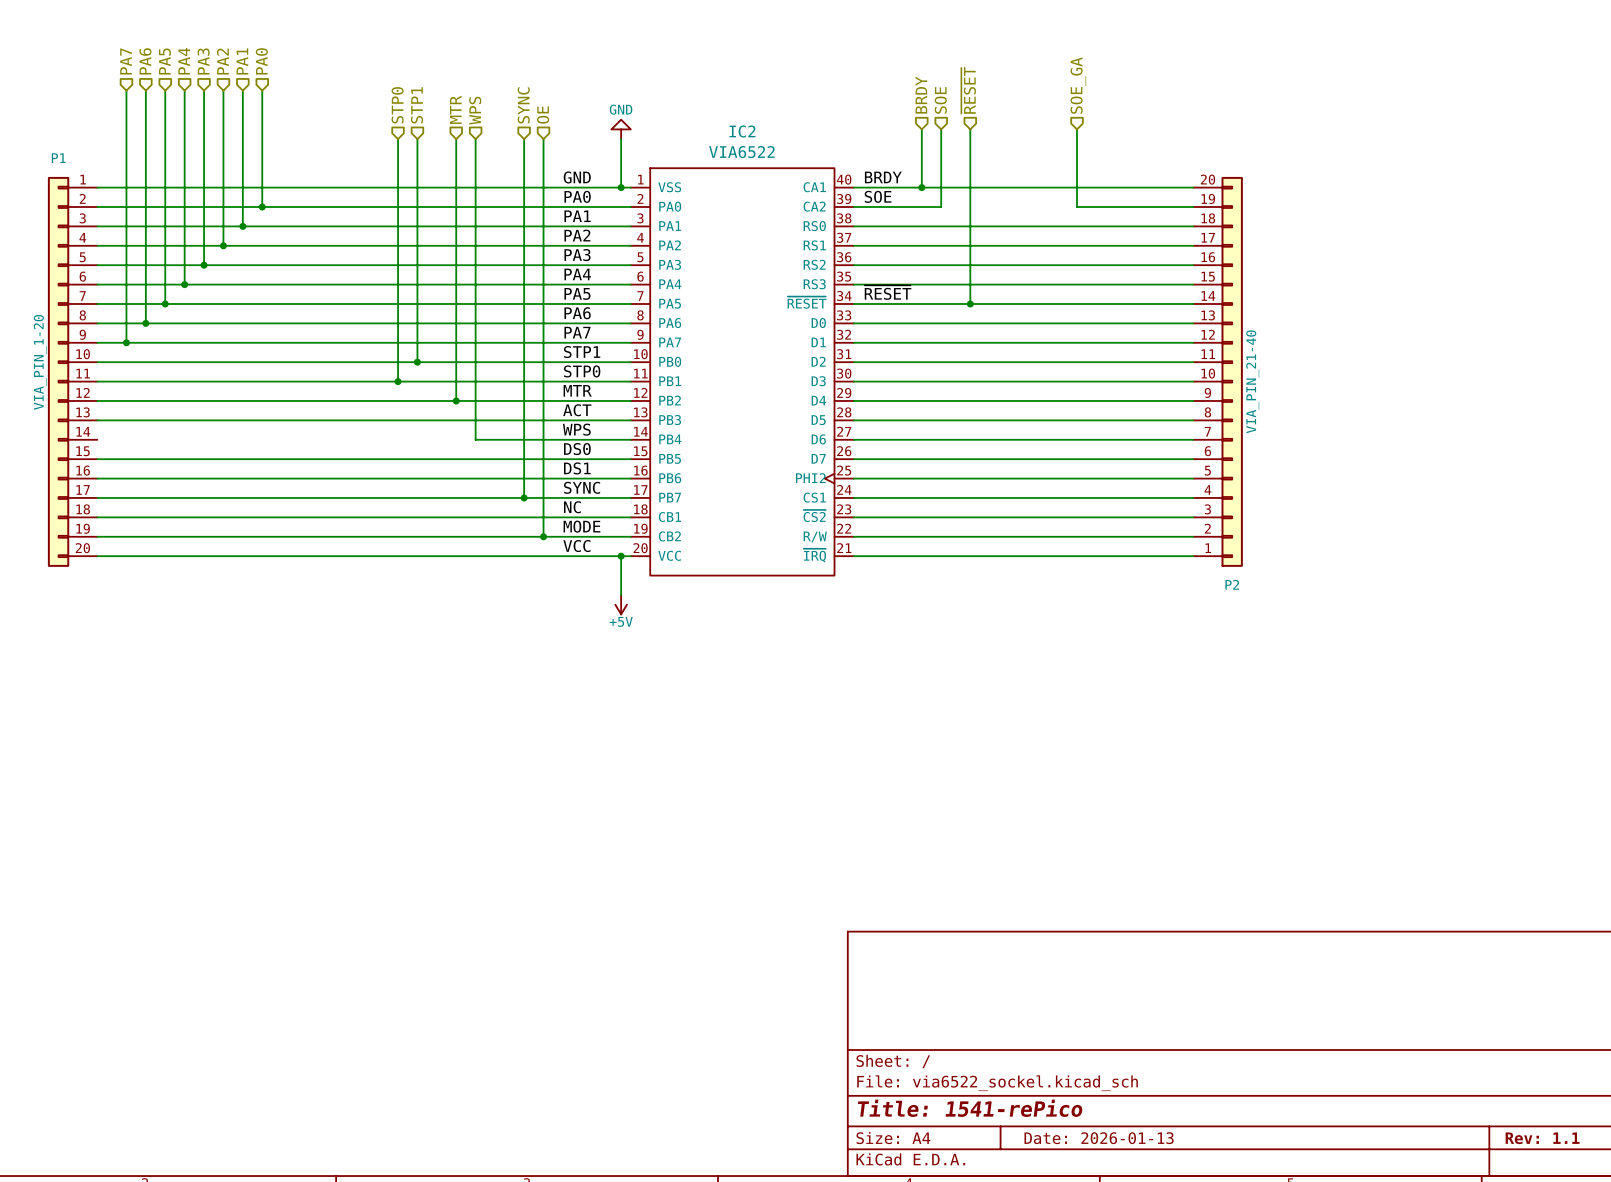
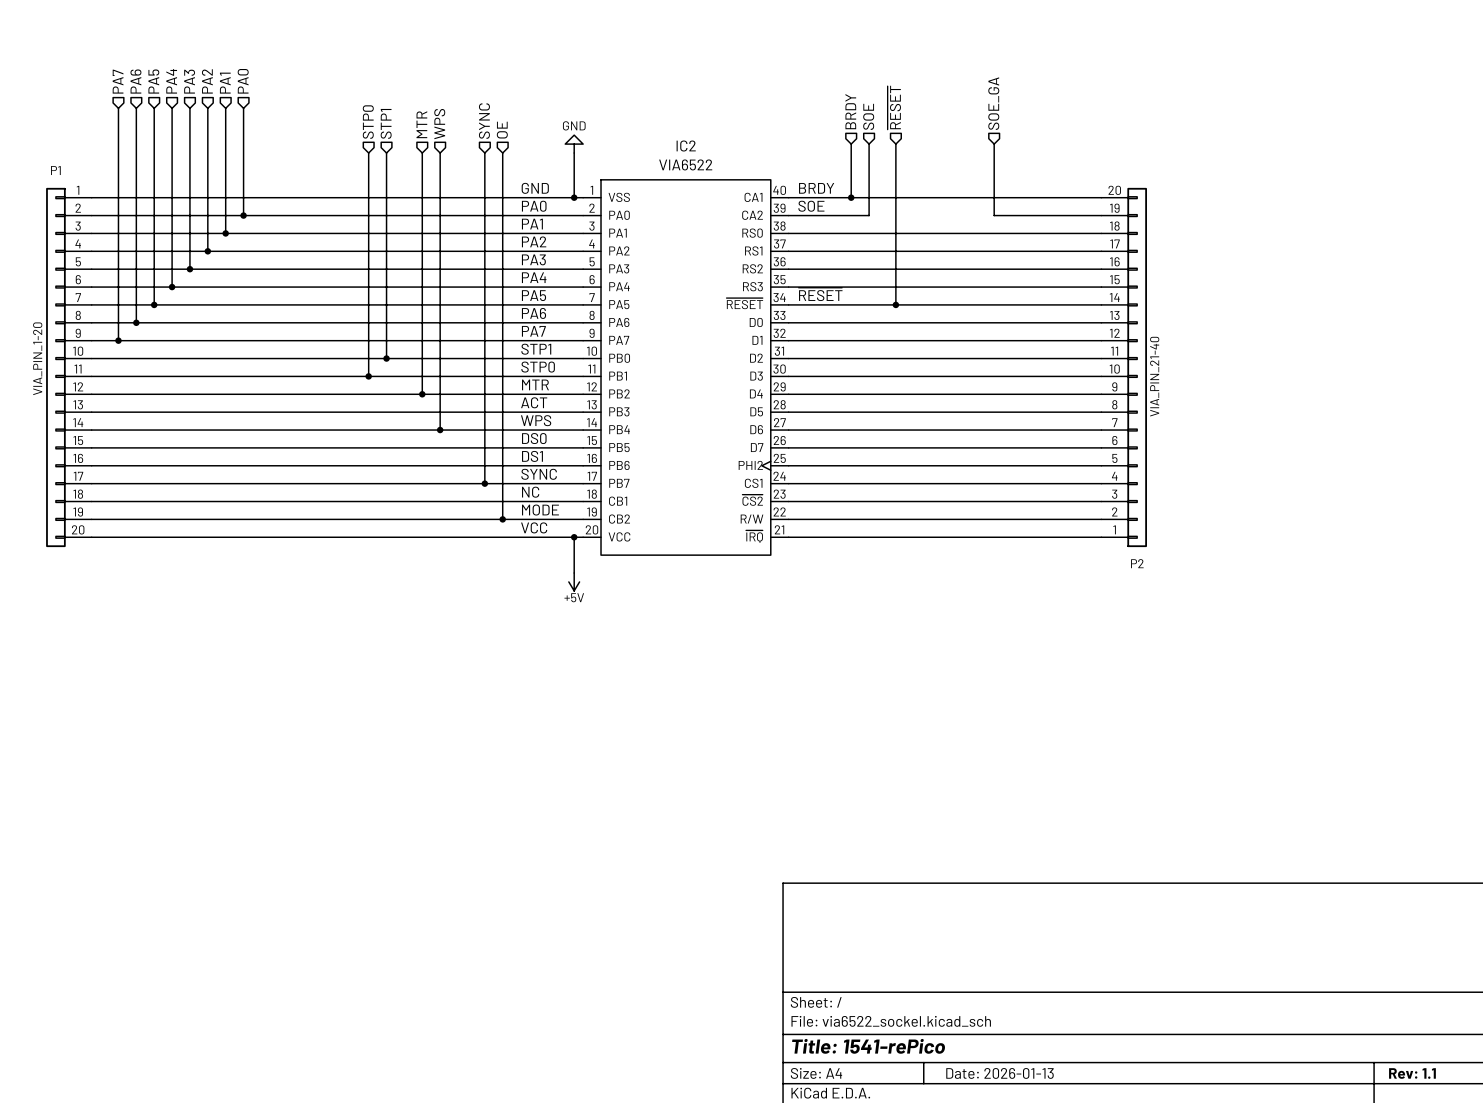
wire: none -> (91, 430) (440, 430)
junction: none -> (440, 430)

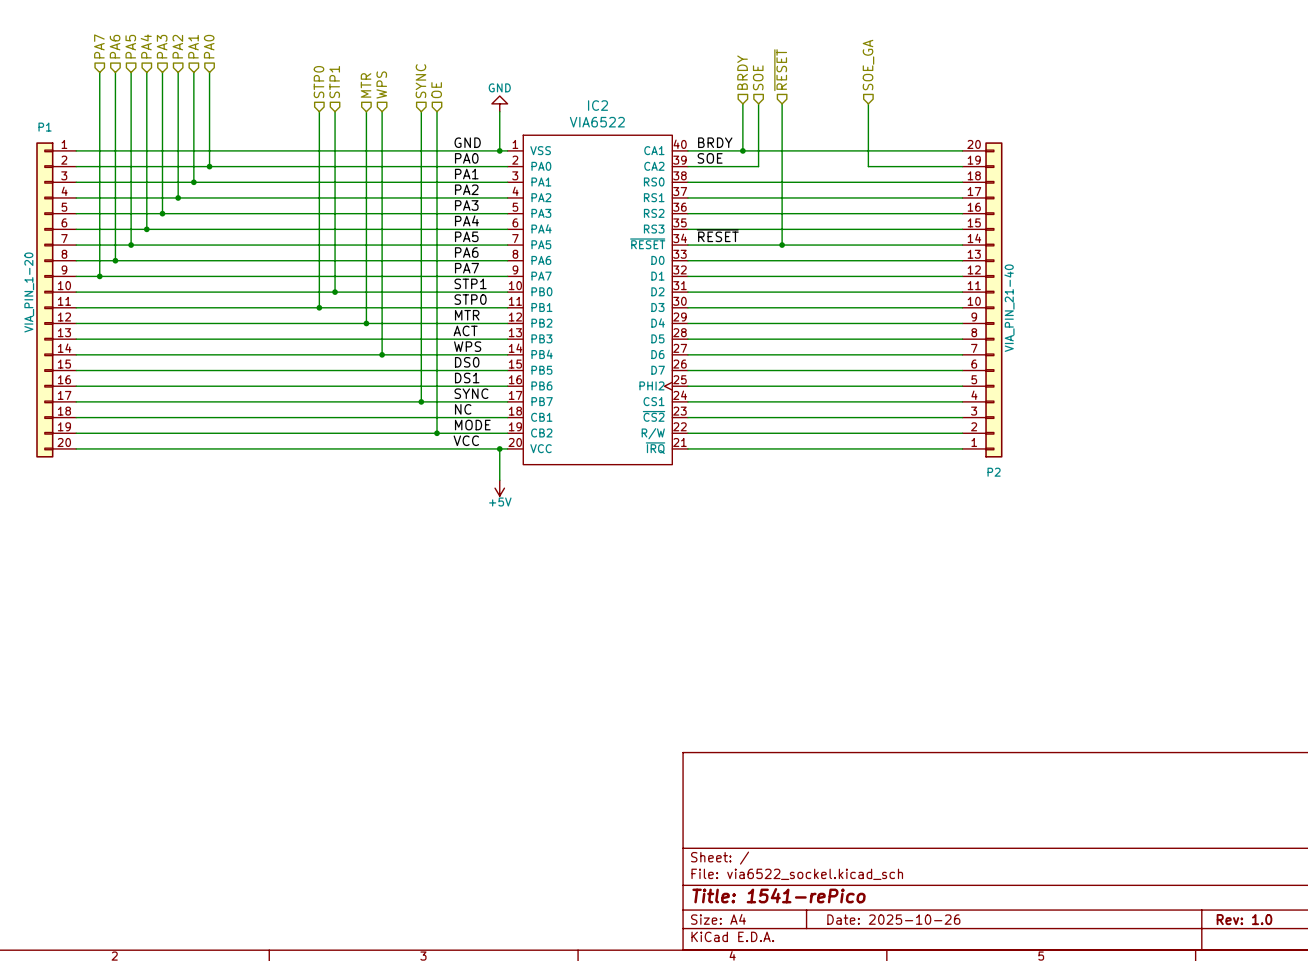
title block: Date: 2026-01-13 (1000, 1073) -> Date: 2025-10-26 (893, 919)
title block: Rev: 1.1 (1412, 1073) -> Rev: 1.0 (1244, 919)

